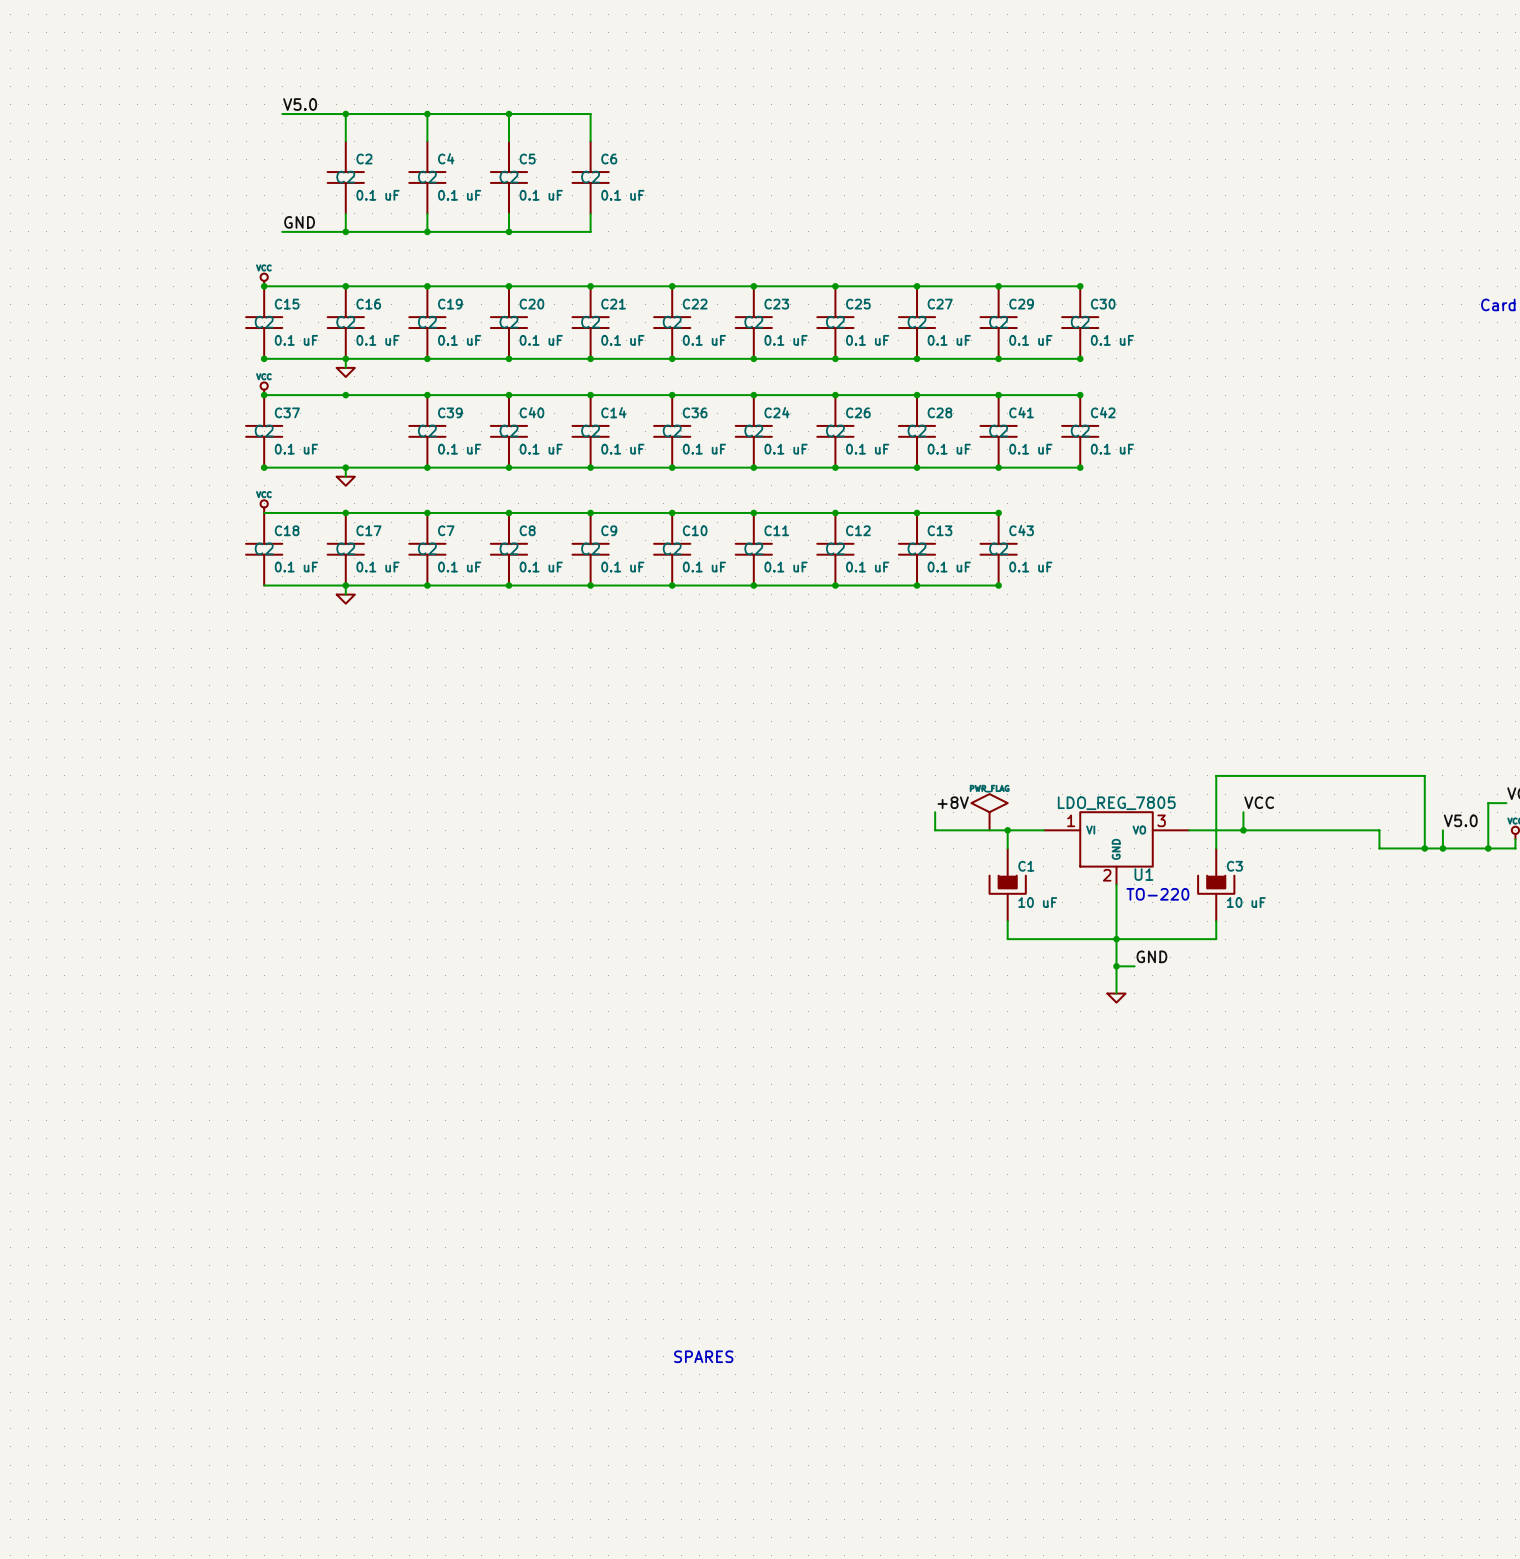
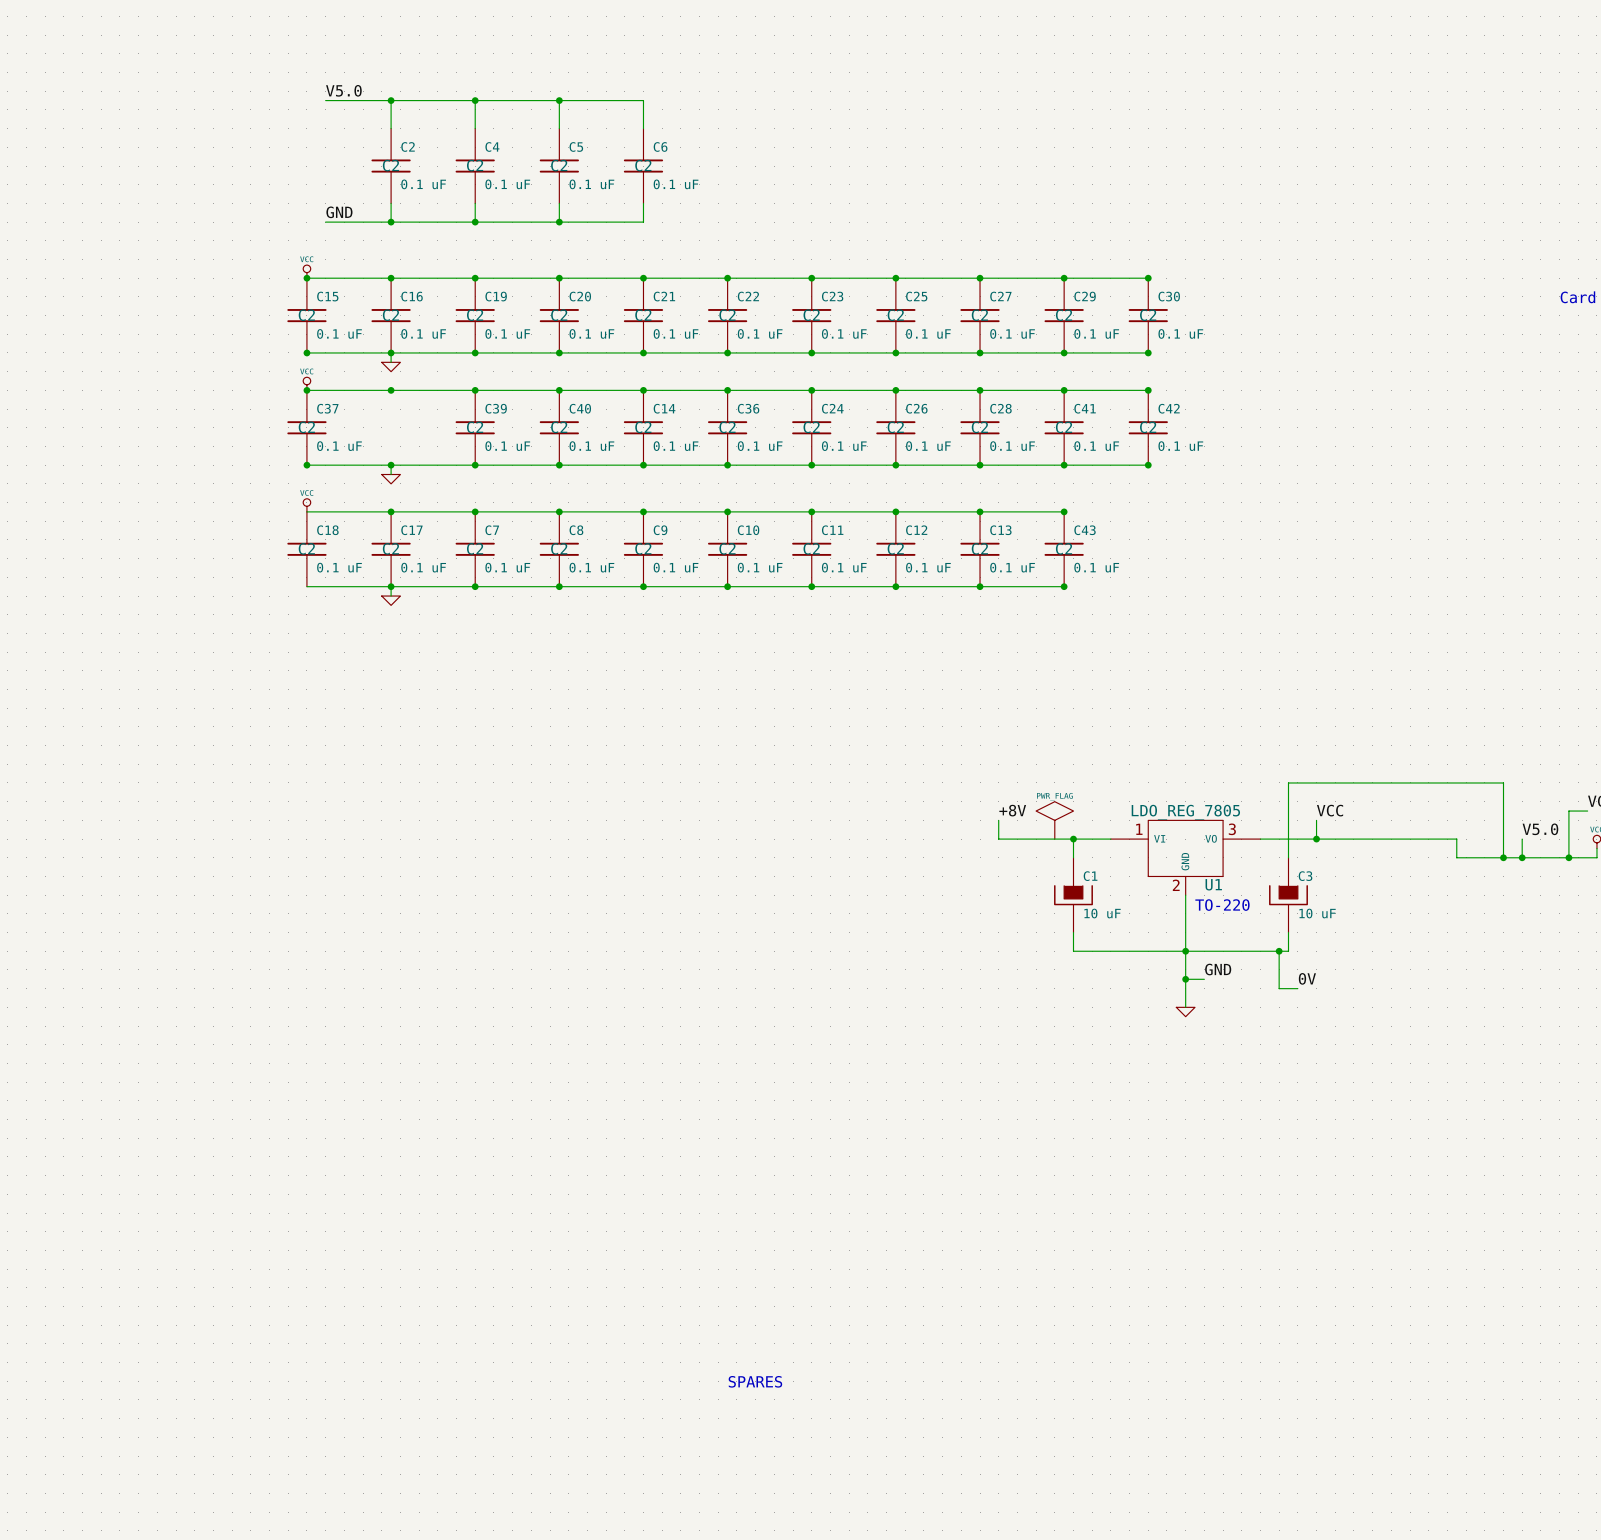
wire: none -> (1279, 951) (1279, 988) (1297, 988)
junction: none -> (1279, 951)
label: none -> 0V (1307, 978)

